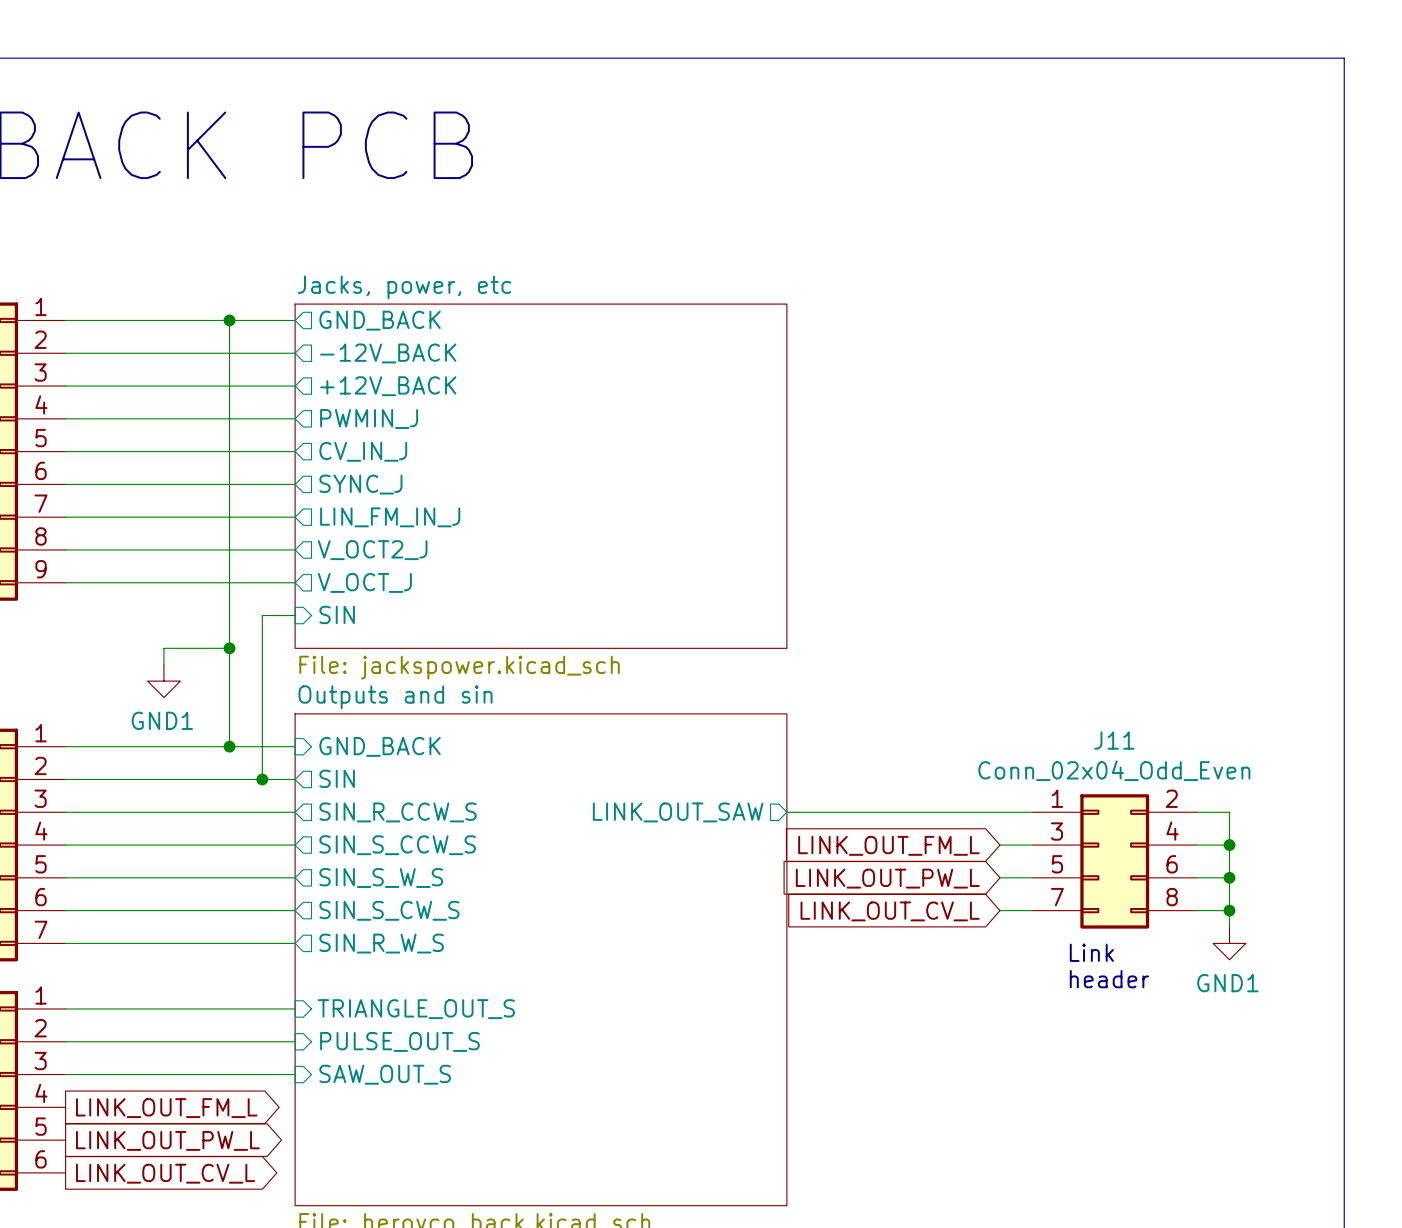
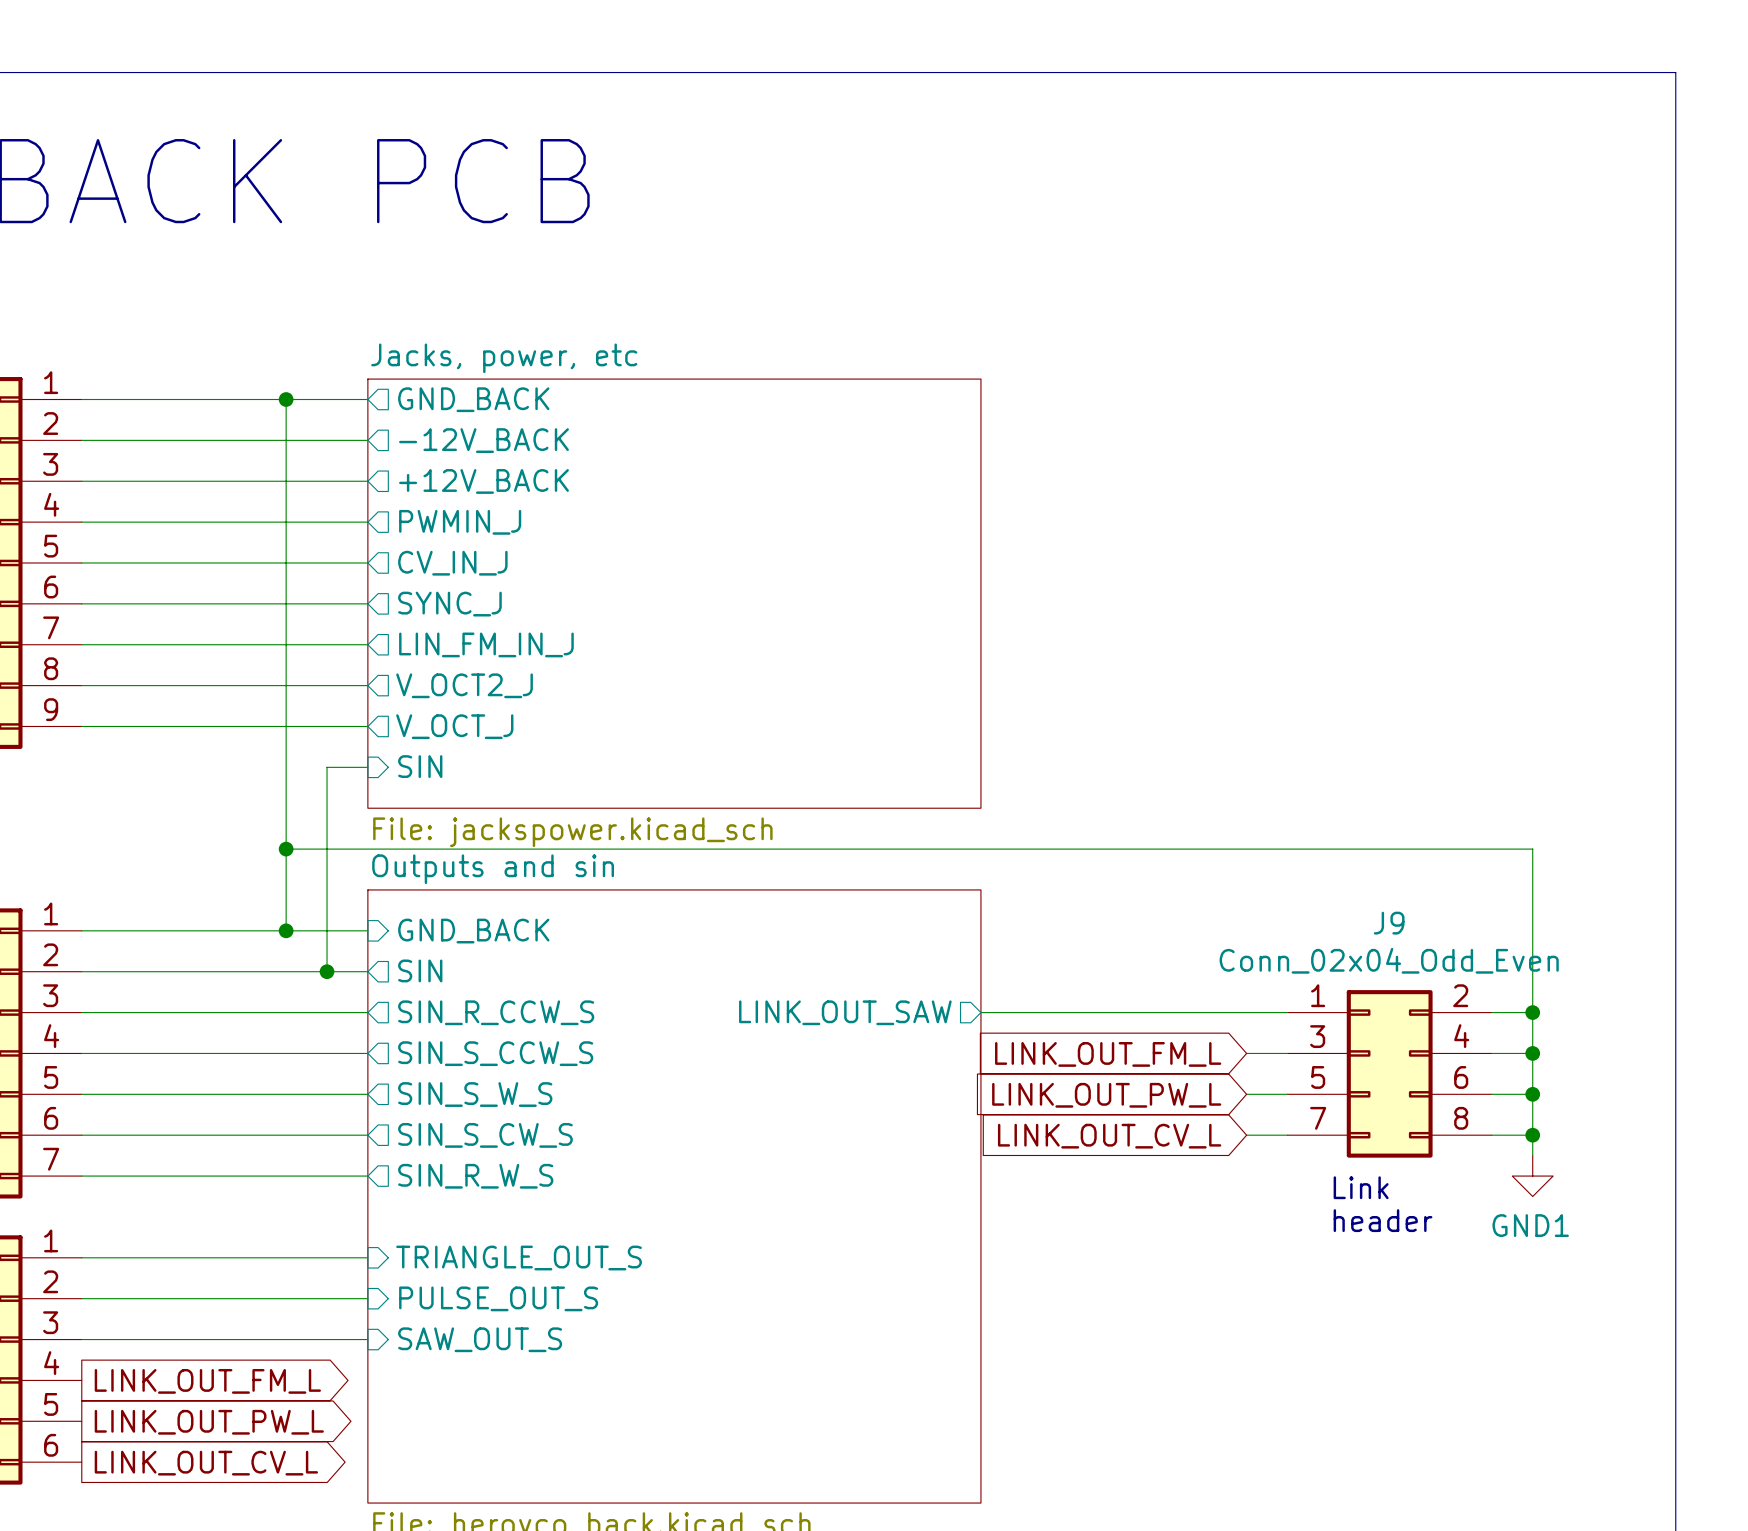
wire: (229, 648) (163, 648) (163, 664) -> none
junction position: (229, 648) -> (286, 849)
power symbol: GND1 (163, 681) -> none
wire: none -> (286, 849) (1532, 849) (1532, 1012)
J11 name: J11 (1114, 740) -> J9 (1389, 923)
junction: none -> (1532, 1012)

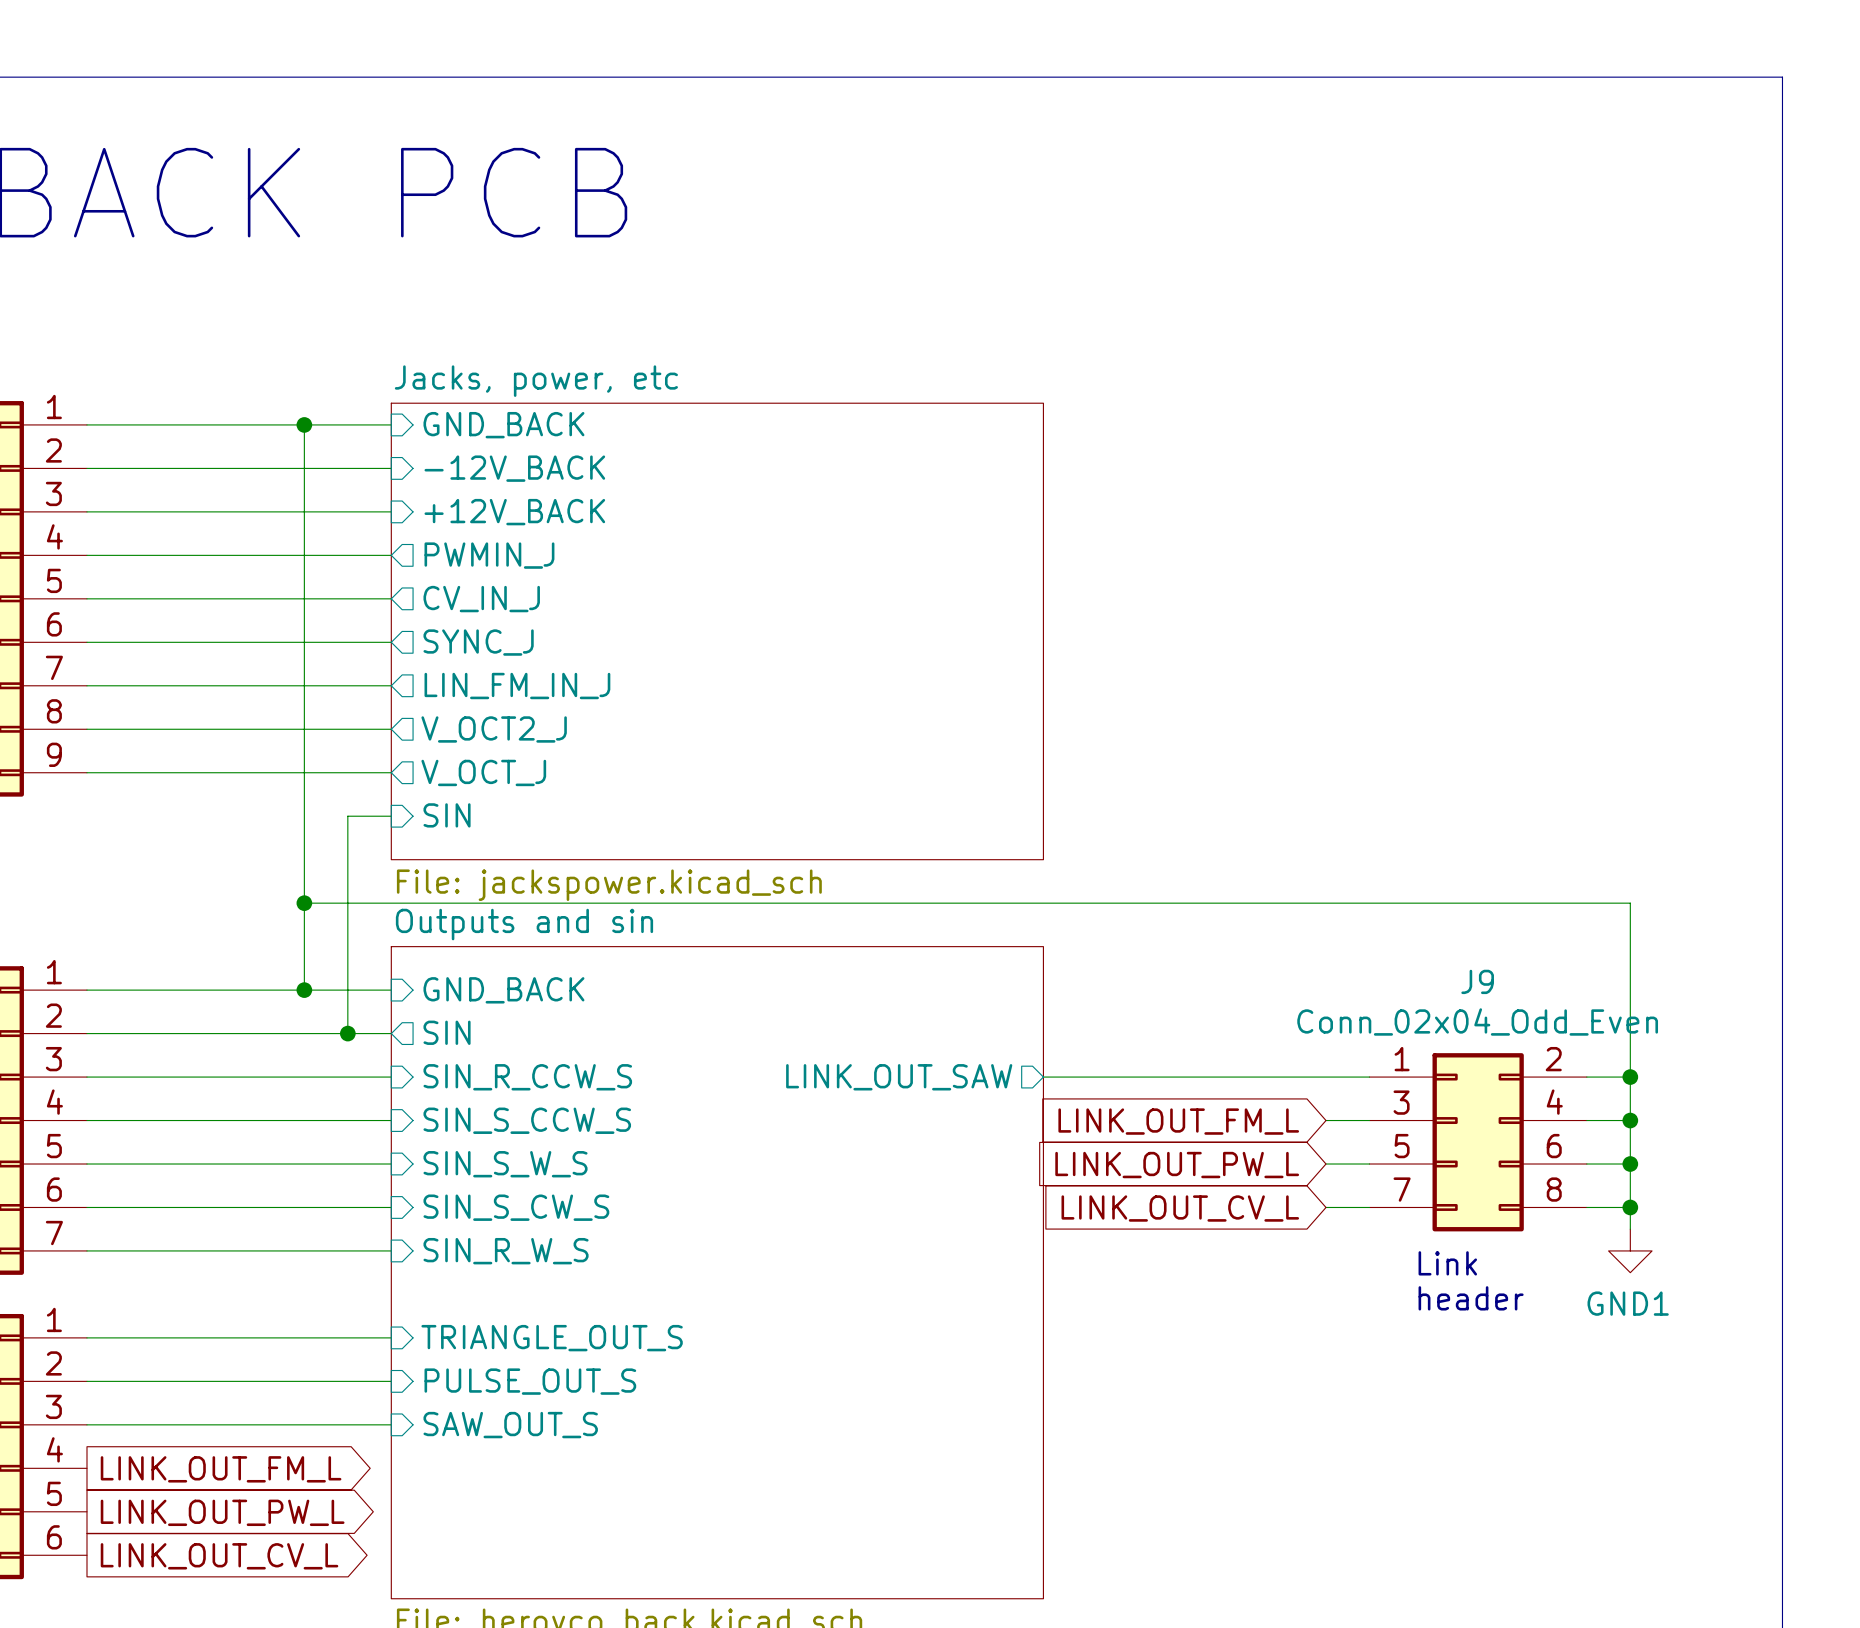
sheet pin shape: output (473, 399) -> input (503, 425)
sheet pin shape: output (484, 440) -> input (514, 468)
sheet pin shape: output (484, 481) -> input (514, 512)
sheet pin shape: output (496, 1012) -> input (527, 1077)
sheet pin shape: output (495, 1053) -> input (527, 1120)
sheet pin shape: output (475, 1094) -> input (505, 1164)
sheet pin shape: output (485, 1135) -> input (516, 1207)
sheet pin shape: output (475, 1176) -> input (506, 1251)

